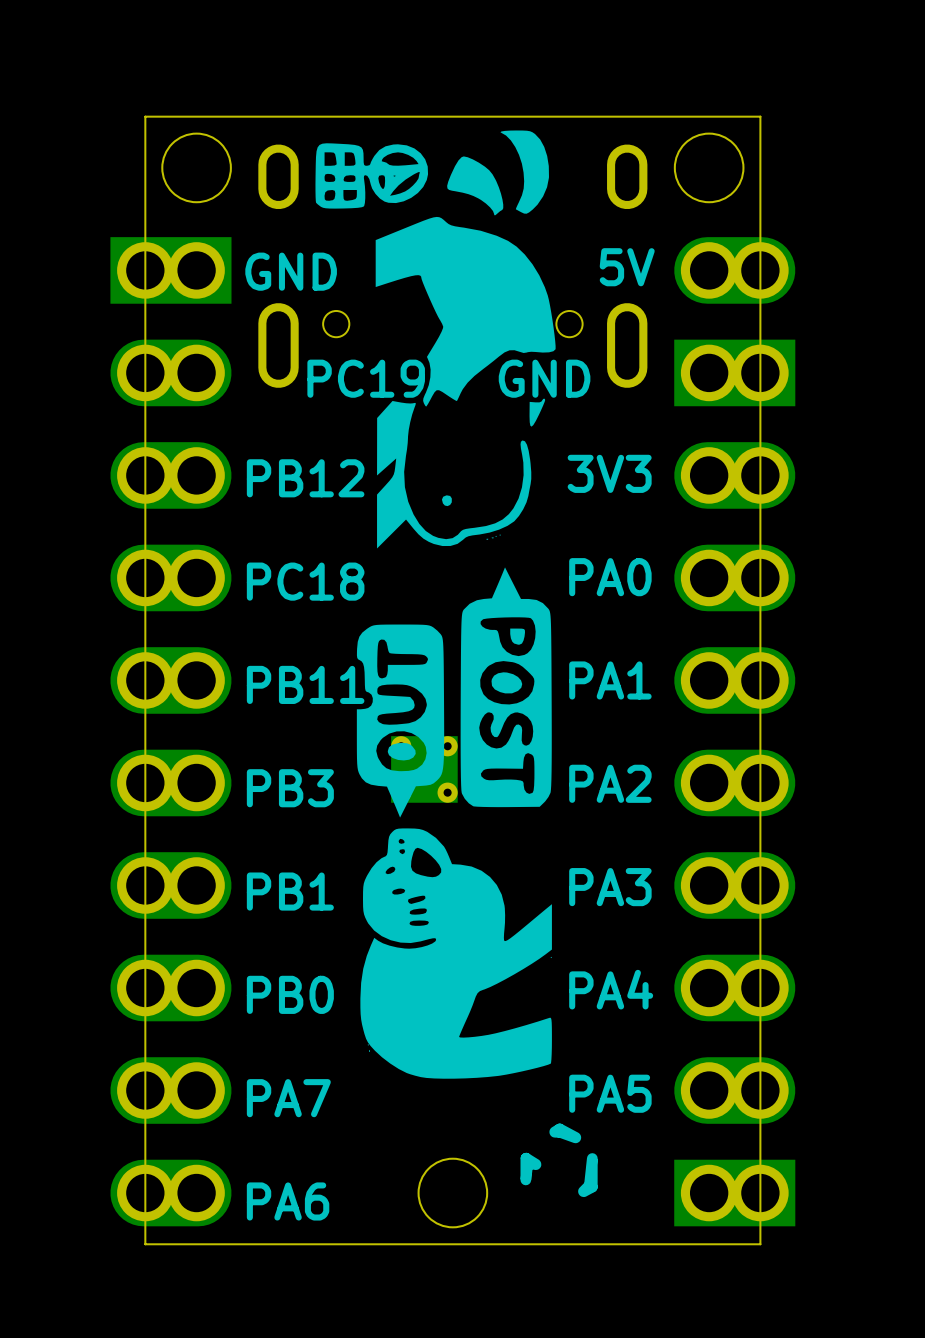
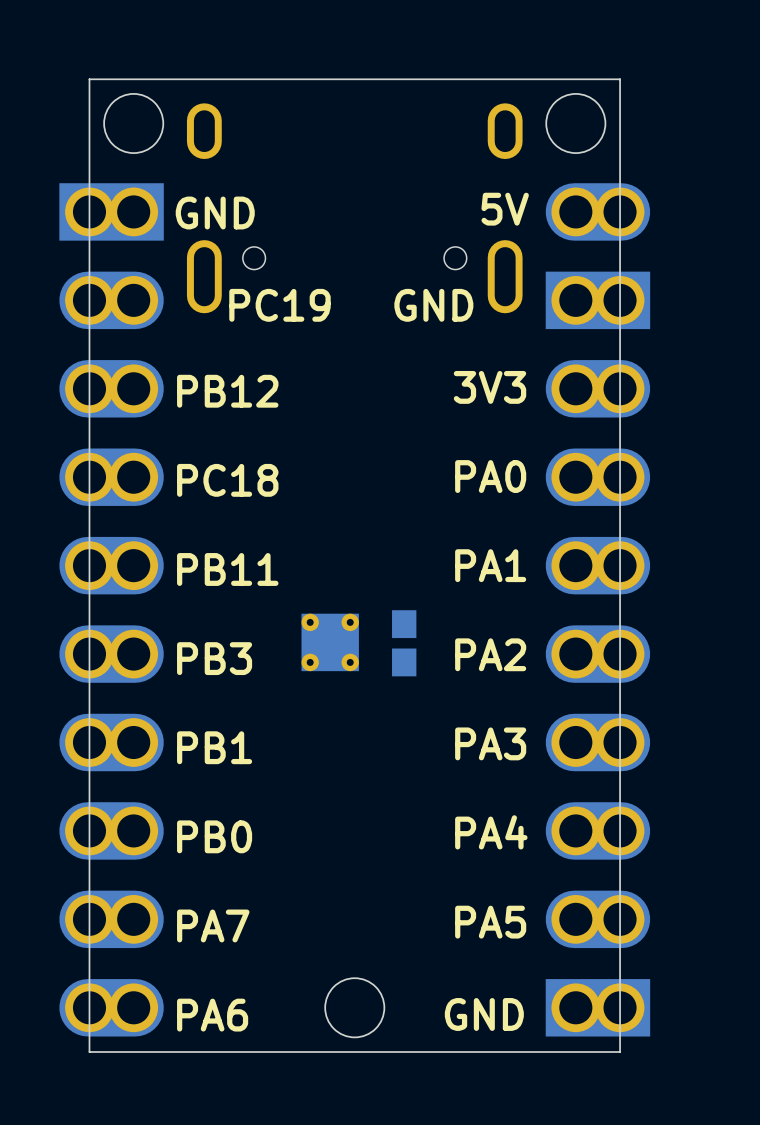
drawing: [269, 130, 598, 1198] -> none
part: none -> (404, 643)
text: none -> GND (484, 1014)

